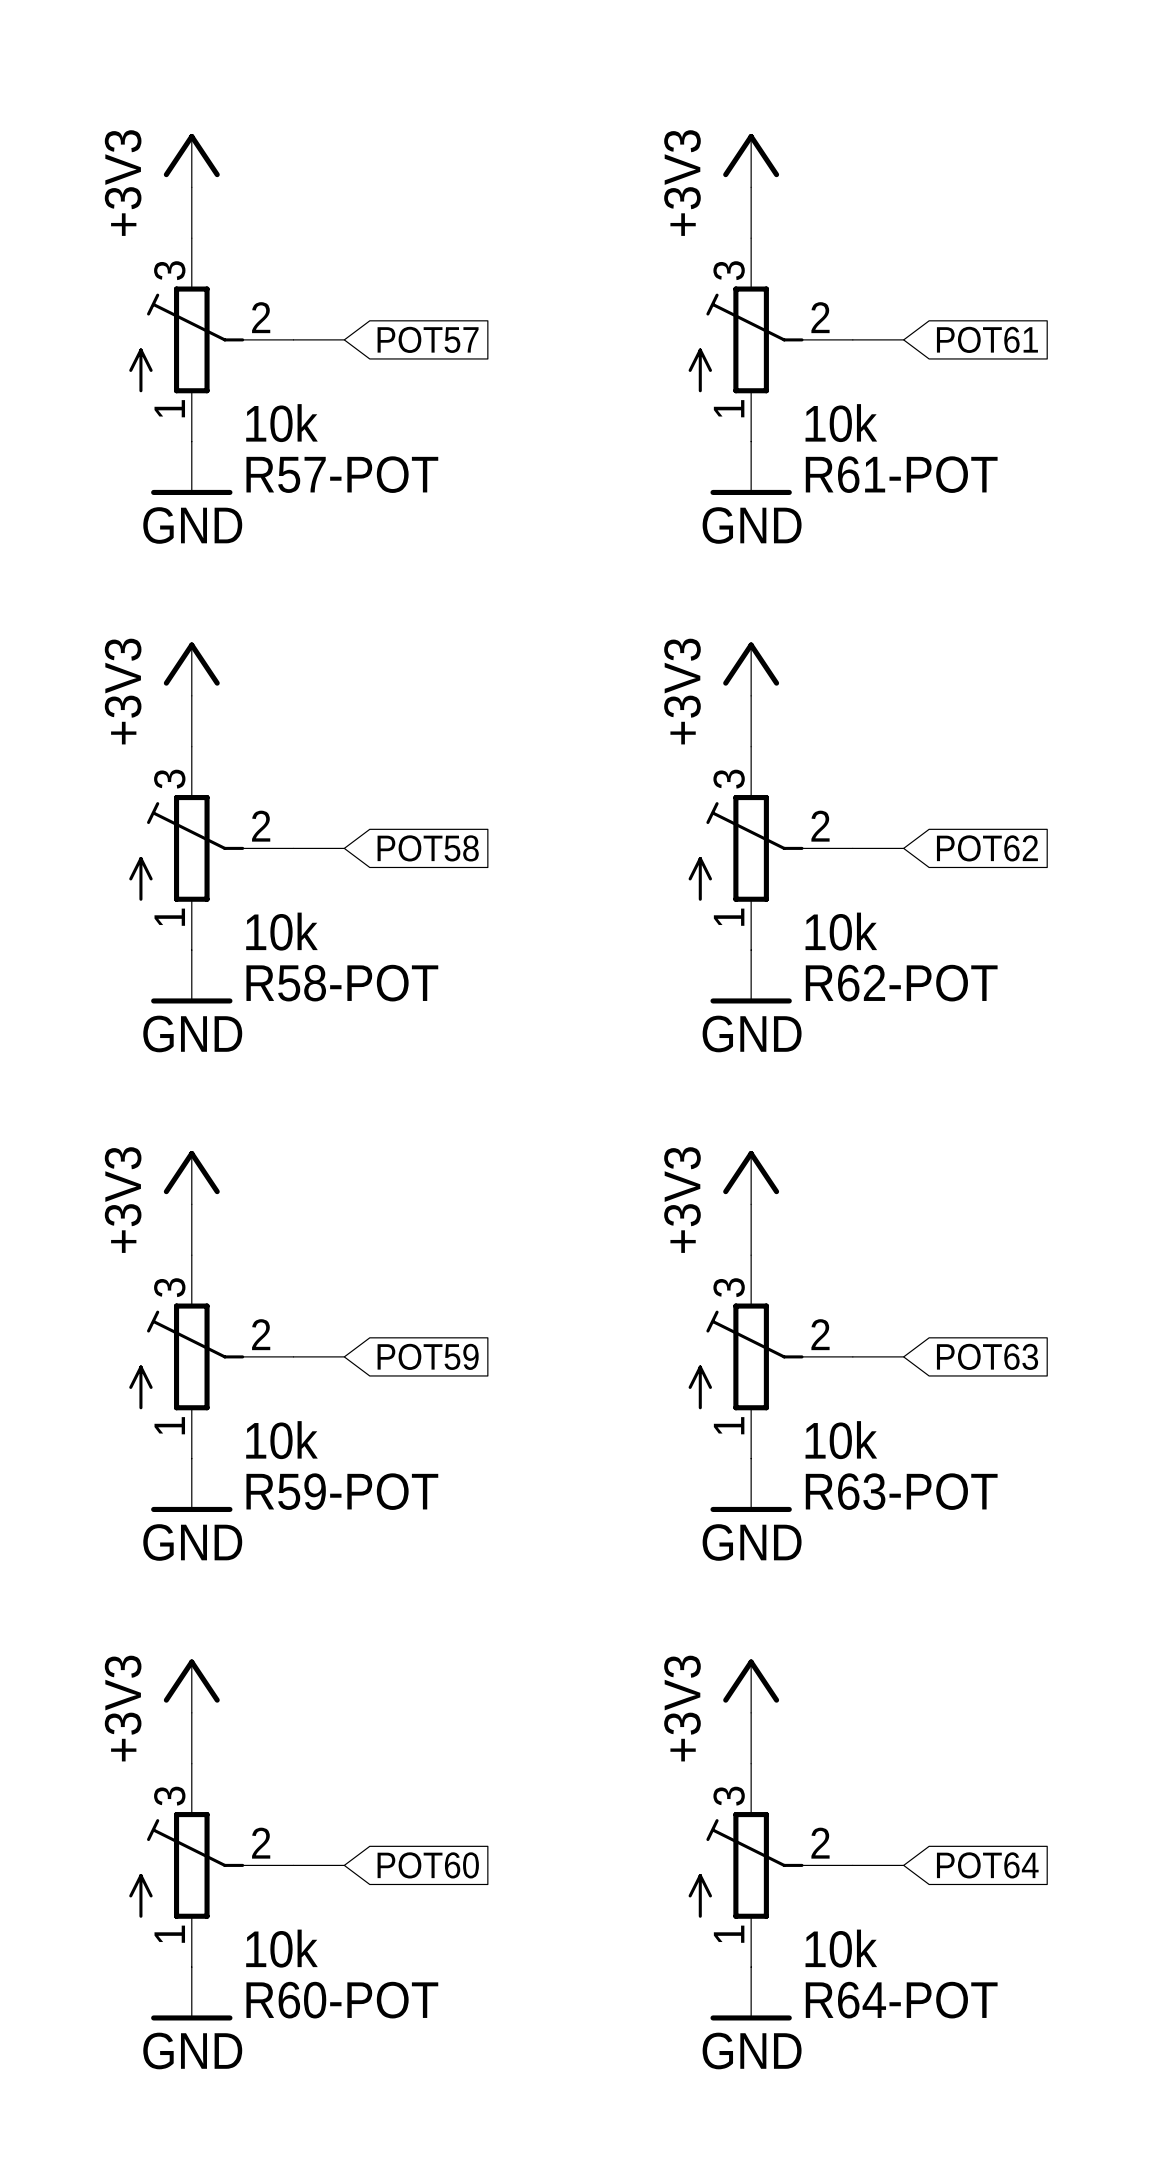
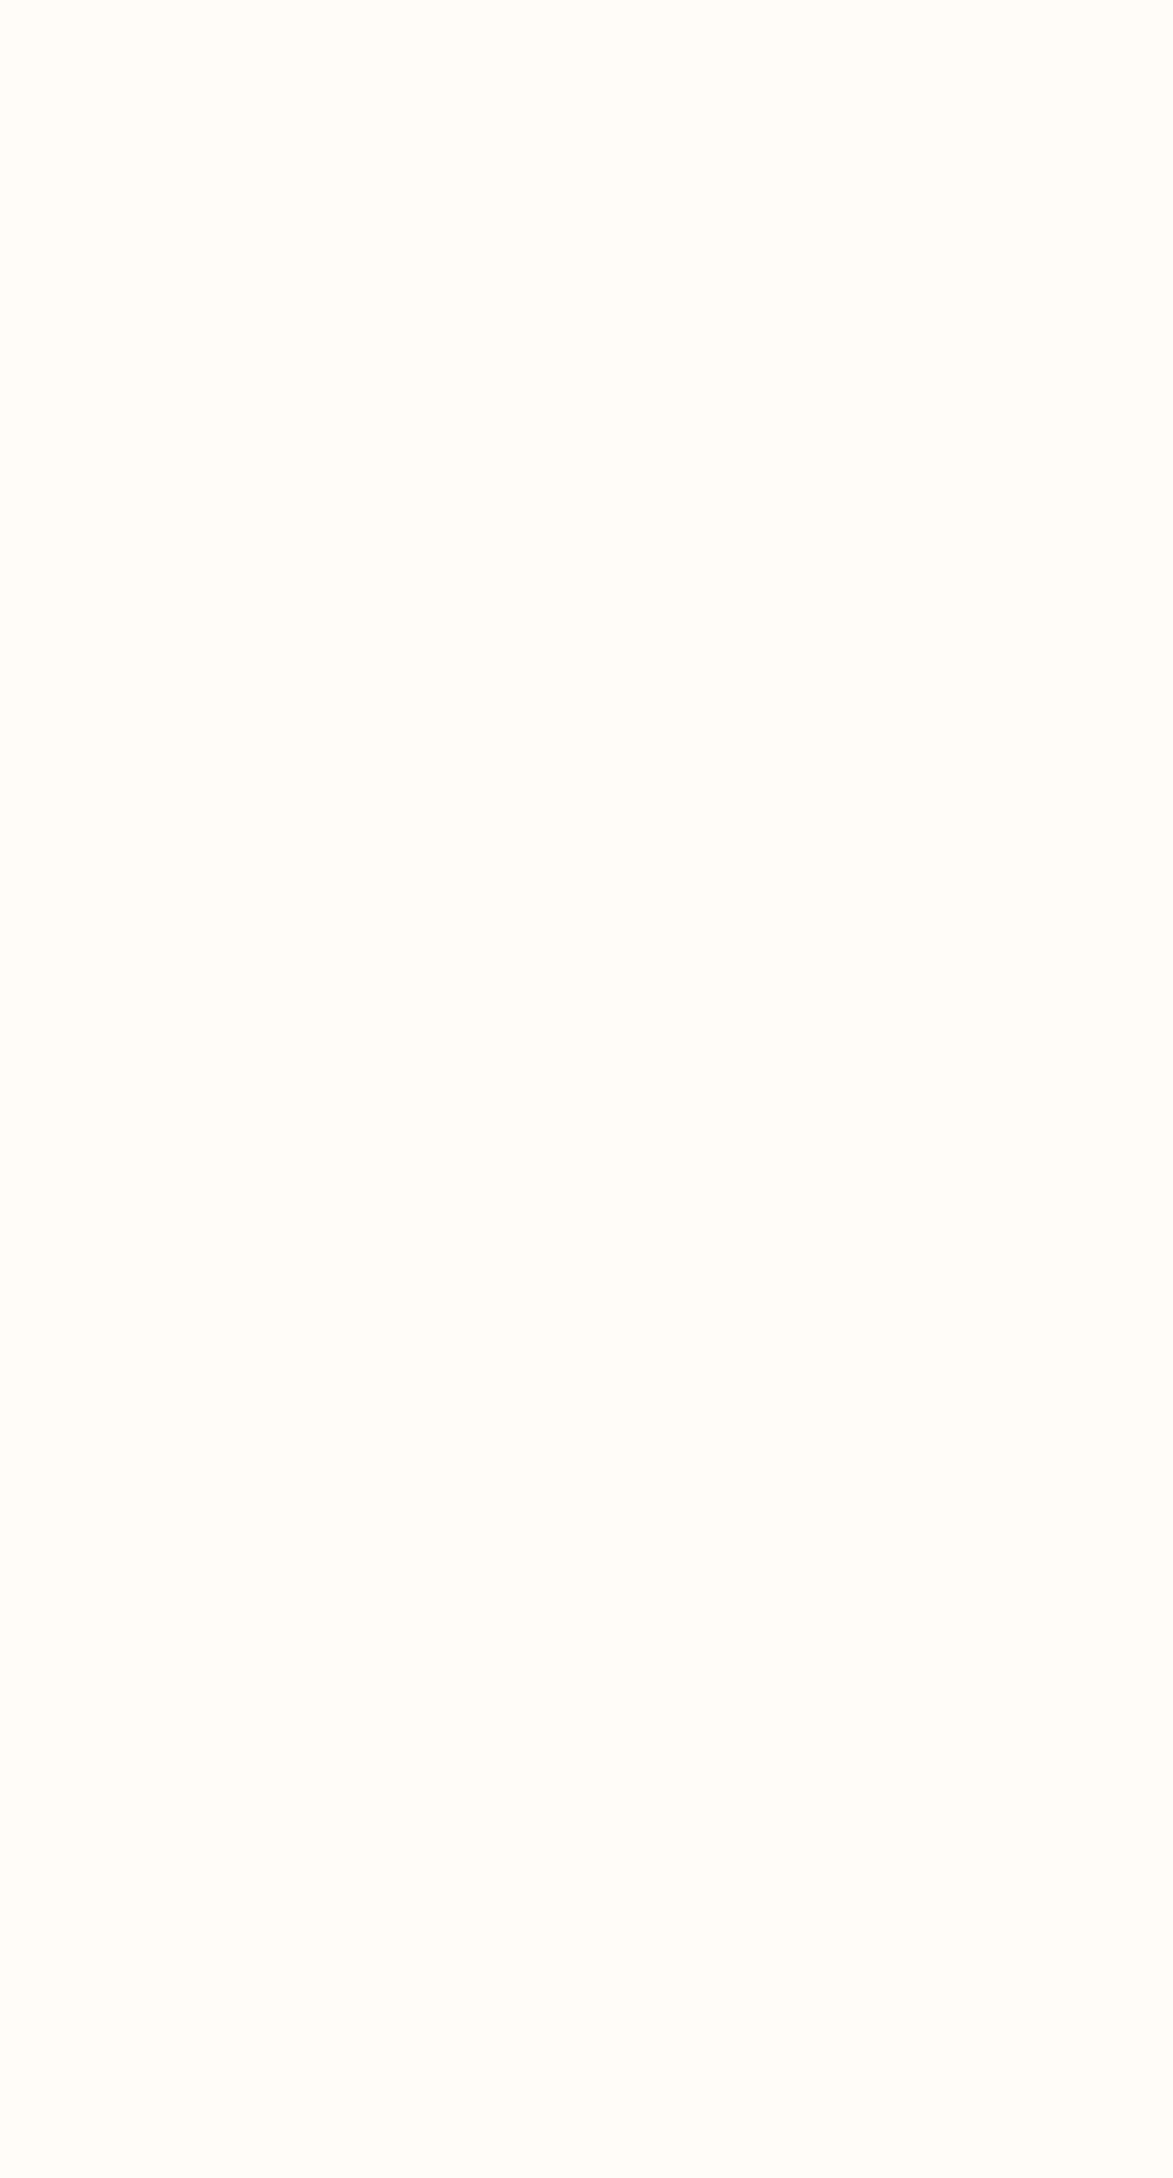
power symbol: +3V3 (191, 160) -> none
power symbol: +3V3 (751, 160) -> none
wire: (191, 187) (191, 238) -> none
wire: (751, 187) (751, 238) -> none
R57-POT: 10k (211, 339) -> none
wire: (293, 339) (344, 339) -> none
global label: POT57 (428, 339) -> none
R61-POT: 10k (770, 339) -> none
wire: (852, 339) (903, 339) -> none
global label: POT61 (987, 339) -> none
power symbol: GND (191, 468) -> none
power symbol: GND (751, 468) -> none
power symbol: +3V3 (191, 669) -> none
power symbol: +3V3 (751, 669) -> none
wire: (191, 695) (191, 746) -> none
wire: (751, 695) (751, 746) -> none
R58-POT: 10k (211, 848) -> none
wire: (293, 848) (344, 848) -> none
global label: POT58 (428, 848) -> none
R62-POT: 10k (770, 848) -> none
wire: (852, 848) (903, 848) -> none
global label: POT62 (987, 848) -> none
power symbol: GND (191, 976) -> none
power symbol: GND (751, 976) -> none
power symbol: +3V3 (191, 1177) -> none
power symbol: +3V3 (751, 1177) -> none
wire: (191, 1204) (191, 1255) -> none
wire: (751, 1204) (751, 1255) -> none
R59-POT: 10k (211, 1356) -> none
wire: (293, 1356) (344, 1356) -> none
global label: POT59 (428, 1356) -> none
R63-POT: 10k (770, 1356) -> none
wire: (852, 1356) (903, 1356) -> none
global label: POT63 (987, 1356) -> none
power symbol: GND (191, 1485) -> none
power symbol: GND (751, 1485) -> none
power symbol: +3V3 (191, 1686) -> none
power symbol: +3V3 (751, 1686) -> none
wire: (191, 1712) (191, 1763) -> none
wire: (751, 1712) (751, 1763) -> none
R60-POT: 10k (211, 1865) -> none
wire: (293, 1865) (344, 1865) -> none
global label: POT60 (428, 1865) -> none
R64-POT: 10k (770, 1865) -> none
wire: (852, 1865) (903, 1865) -> none
global label: POT64 (987, 1865) -> none
power symbol: GND (191, 1993) -> none
power symbol: GND (751, 1993) -> none

